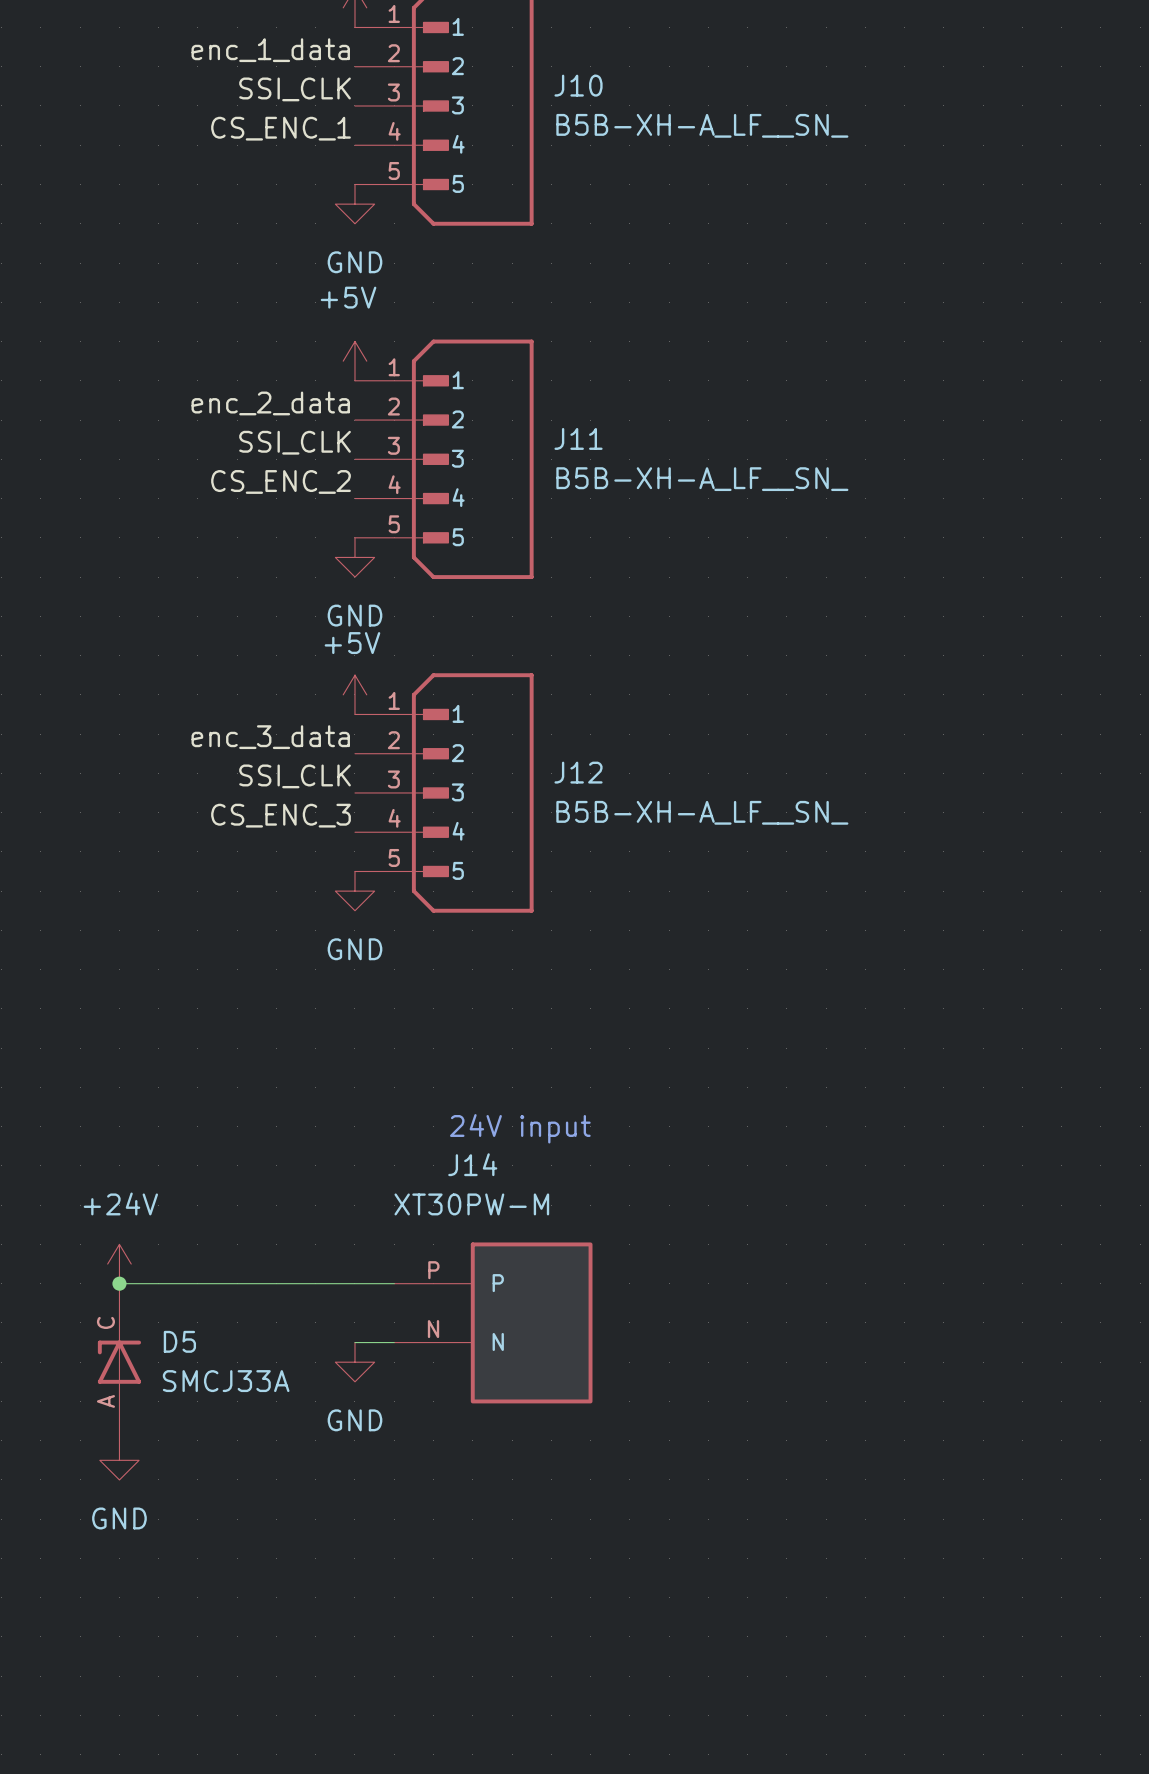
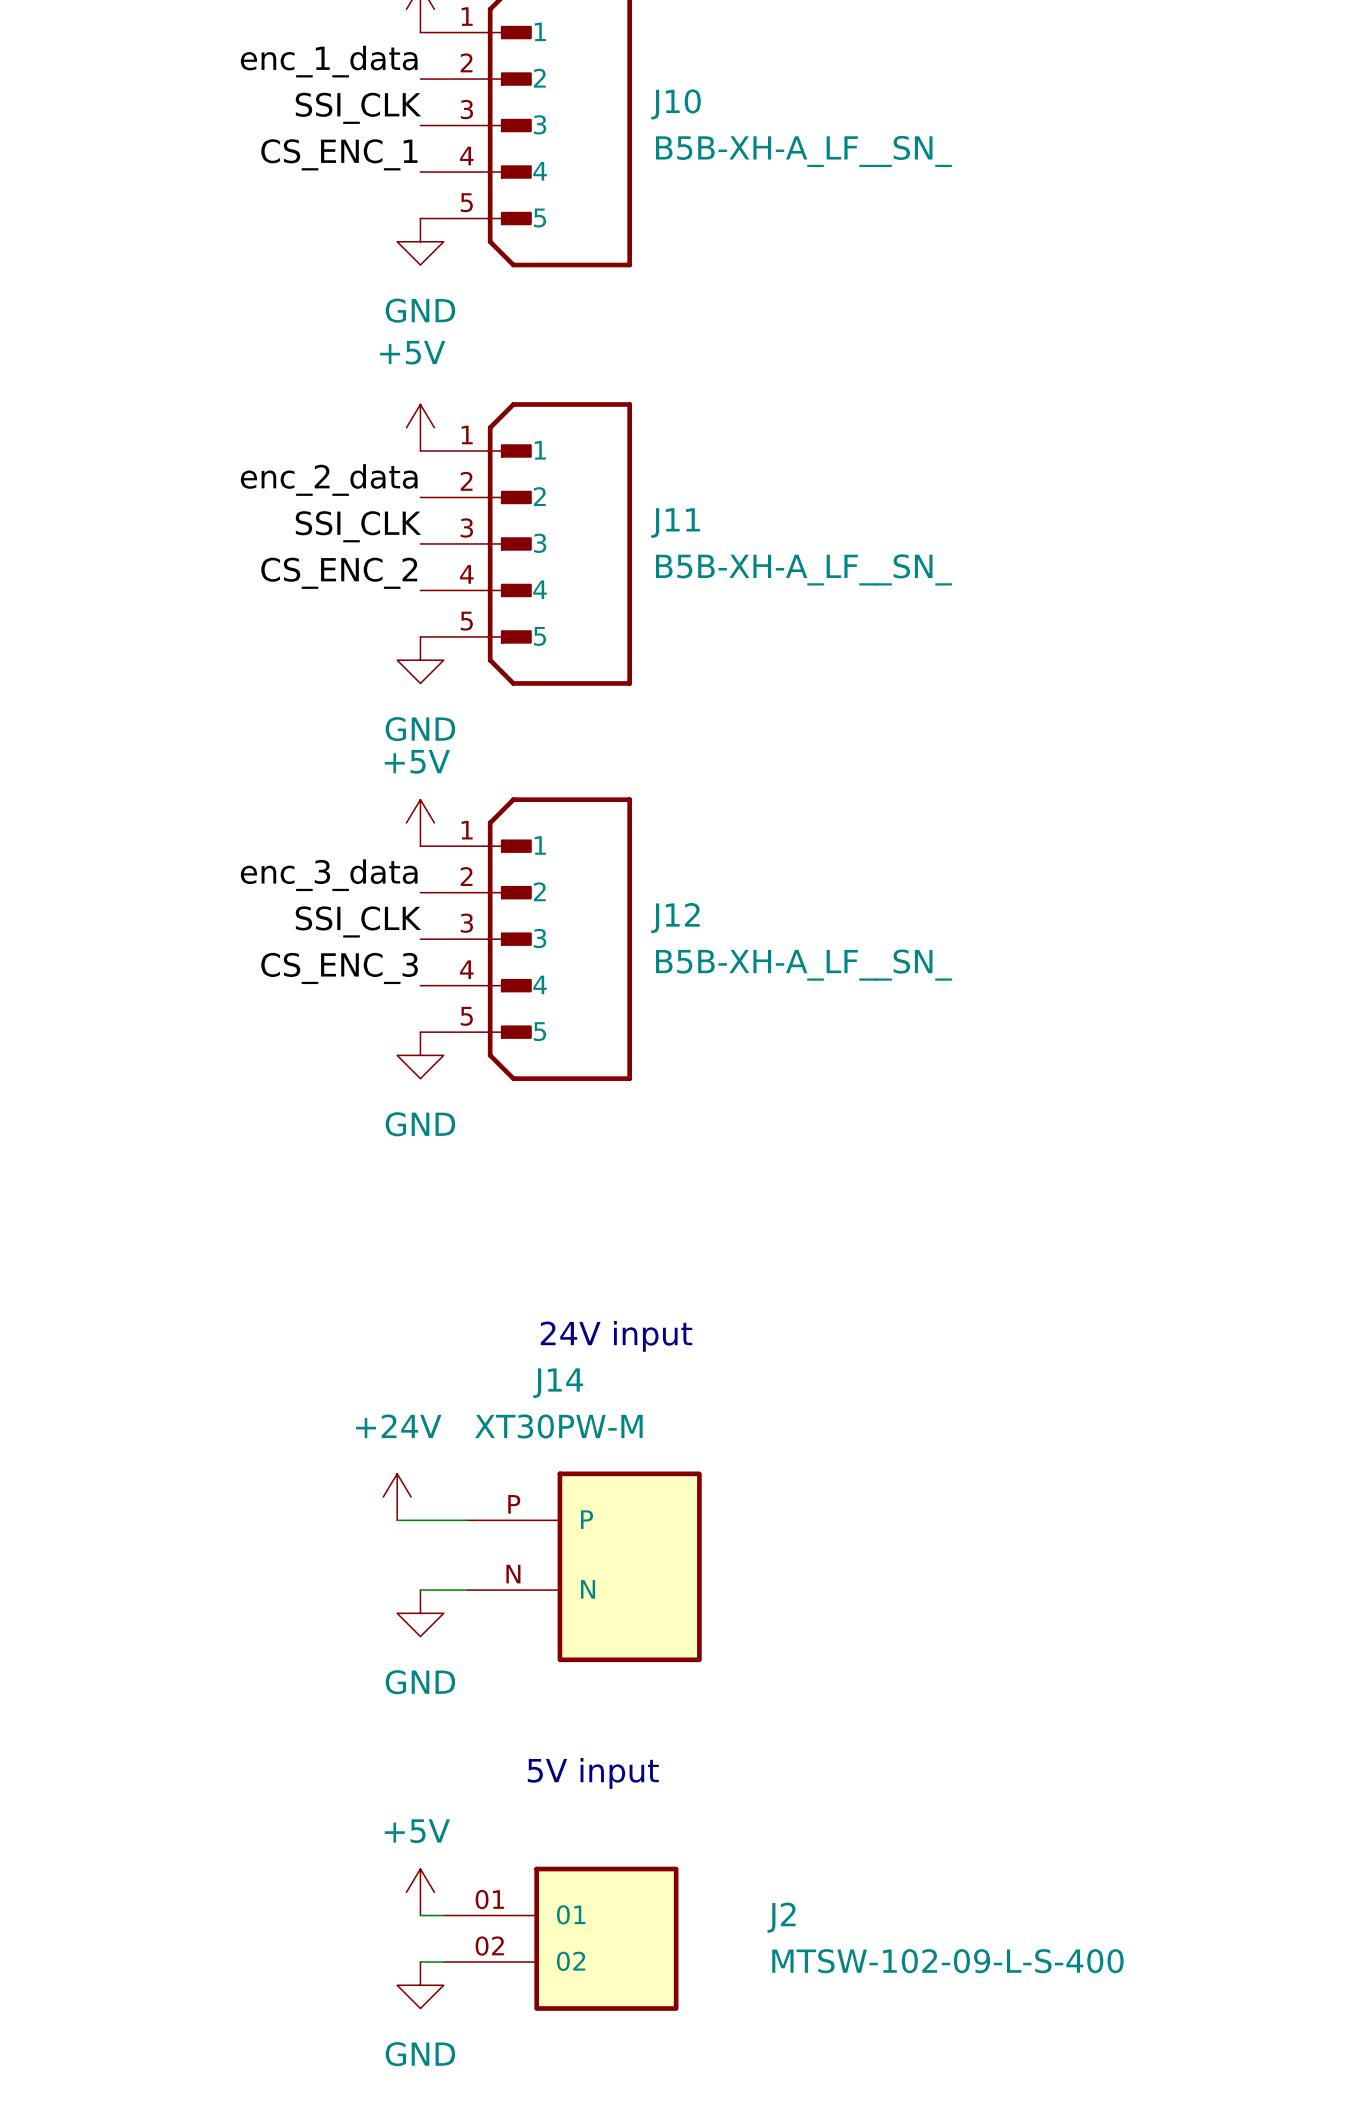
power symbol position: +24V (119, 1264) -> +24V (397, 1497)
wire: (119, 1283) (335, 1283) -> none
junction: (119, 1283) -> none
D5: SMCJ33A (119, 1362) -> none
power symbol position: GND (119, 1460) -> GND (420, 1985)
text: none -> 5V input (593, 1773)
power symbol: none -> +5V (420, 1892)
wire: none -> (420, 1915) (443, 1915)
J2: none -> MTSW-102-09-L-S-400 (561, 1938)
wire: none -> (420, 1962) (443, 1962)

